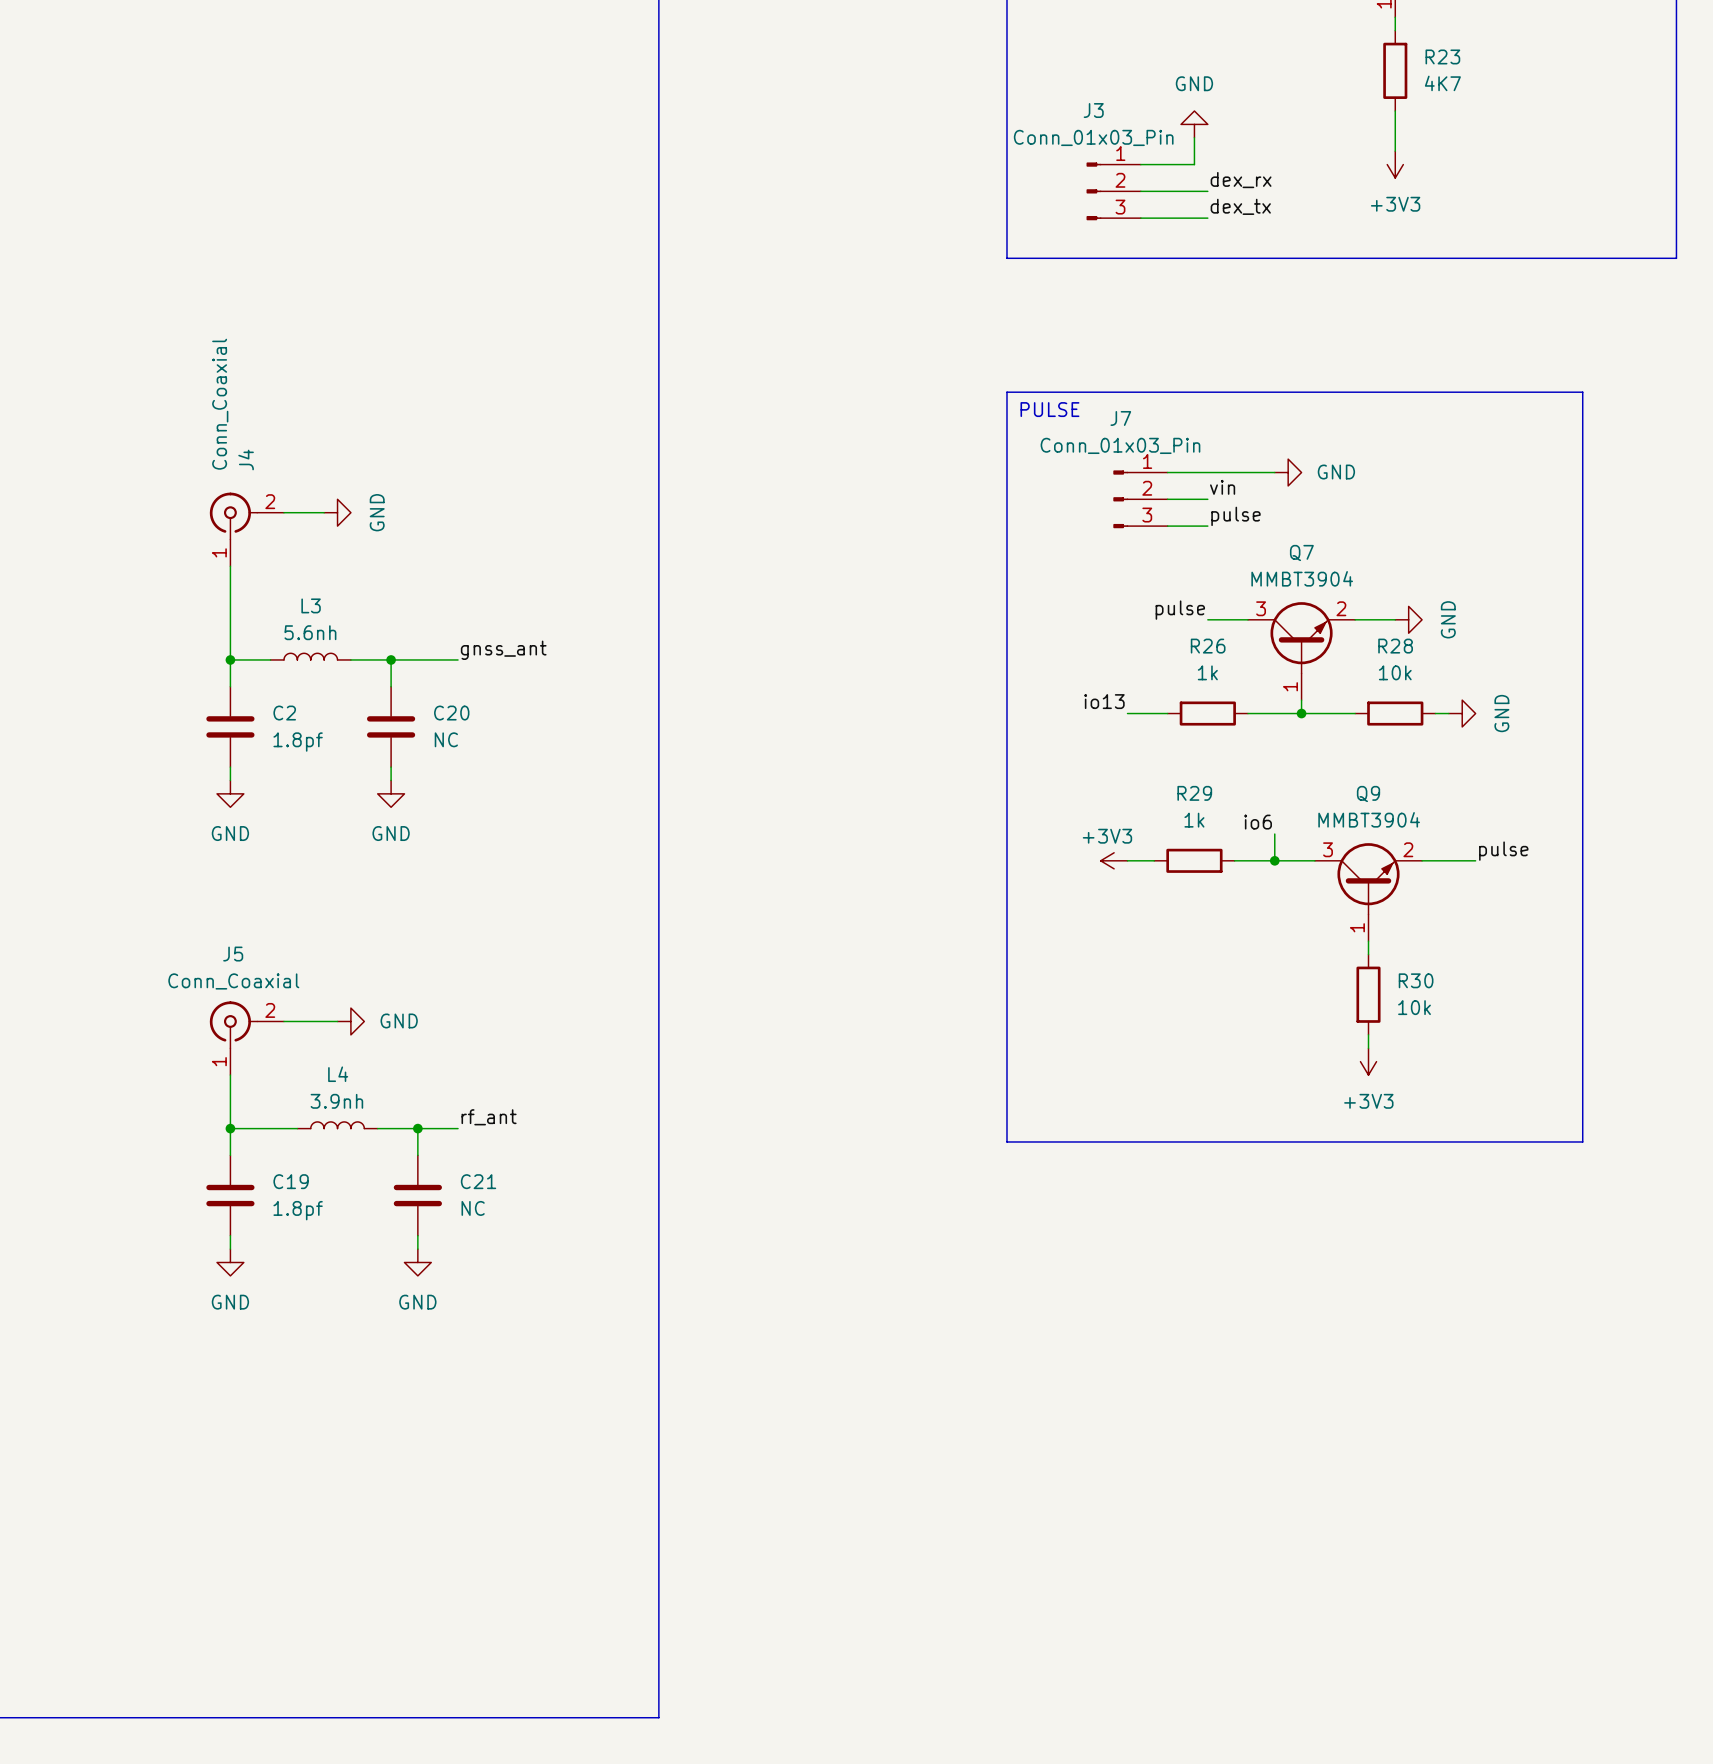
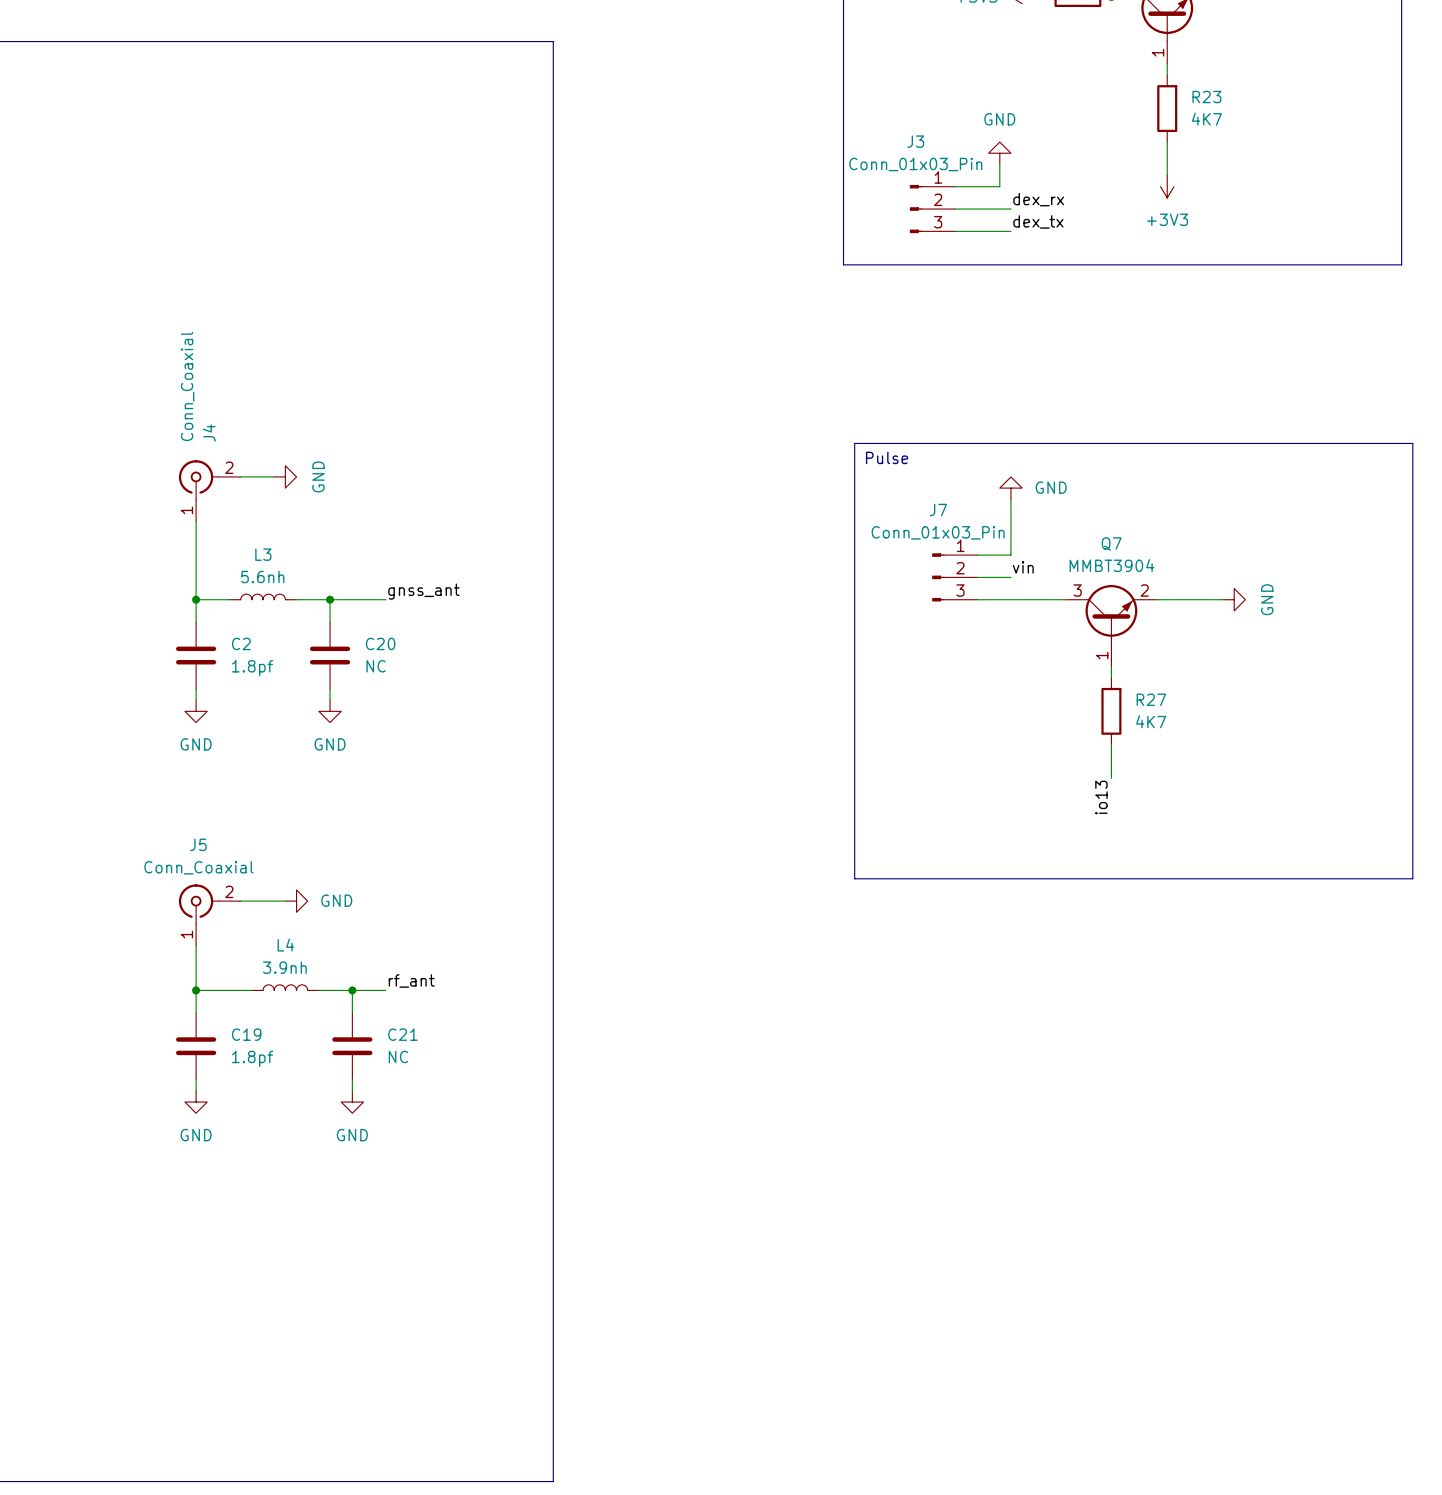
line: (1006, 392) (1582, 392) (1582, 1141) (1006, 1141) (1006, 392) -> (854, 443) (854, 878) (1412, 878) (1412, 443) (854, 443)
text: PULSE (1049, 409) -> none
power symbol rotation: 0° (1288, 472) -> 90° counterclockwise (1010, 488)
power symbol position: GND (1288, 472) -> GND (1010, 488)
label position: vin (1222, 487) -> vin (1023, 567)
text: none -> Pulse (887, 457)
J7 position: (1140, 499) -> (954, 577)
wire: (1167, 499) (1207, 499) -> none
label: pulse (1235, 516) -> none
wire: (1167, 526) (1207, 526) -> none
wire: none -> (1010, 499) (1010, 555) (977, 555)
label: pulse (1180, 610) -> none
wire: (1207, 619) (1248, 619) -> (977, 577) (1010, 577)
wire: (1355, 619) (1395, 619) -> none
power symbol: GND (1408, 619) -> none
Q7 position: (1301, 651) -> (1111, 625)
power symbol: none -> GND (1234, 599)
wire: (1301, 700) (1301, 713) -> (1111, 666) (1111, 677)
label rotation: 0° (1104, 701) -> 90° counterclockwise (1101, 797)
label position: io13 (1104, 701) -> io13 (1101, 797)
wire: (1127, 713) (1167, 713) -> none
R26: 1k (1207, 713) -> none
wire: (1248, 713) (1355, 713) -> (977, 599) (1066, 599)
junction: (1301, 713) -> none
R28: 10k (1395, 713) -> none
wire: (1435, 713) (1448, 713) -> none
power symbol: GND (1462, 713) -> none
R27: none -> 4K7 (1111, 711)
label: io6 (1258, 822) -> none
wire: (1274, 834) (1274, 860) -> none
wire: none -> (1111, 744) (1111, 778)
label: pulse (1503, 851) -> none
power symbol: +3V3 (1114, 860) -> none
wire: (1127, 860) (1154, 860) -> none
R29: 1k (1194, 860) -> none
wire: (1234, 860) (1314, 860) -> (1156, 599) (1223, 599)
junction: (1274, 860) -> none
wire: (1422, 860) (1475, 860) -> none
Q9: MMBT3904 (1368, 892) -> none
wire: (1368, 941) (1368, 954) -> none
R30: 10k (1368, 994) -> none
wire: (1368, 1034) (1368, 1048) -> none
power symbol: +3V3 (1368, 1061) -> none

